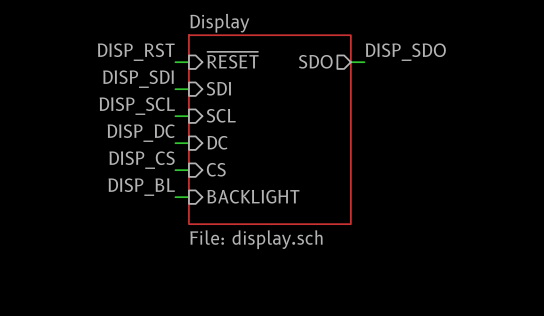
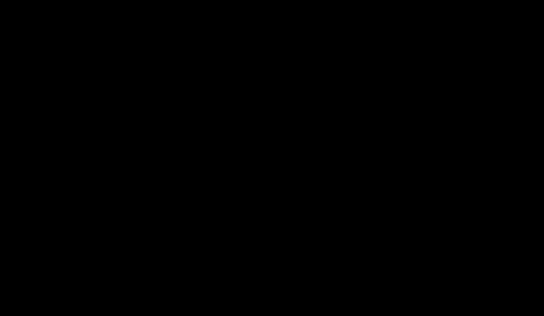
label: DISP_RST (136, 52) -> none
label: DISP_SDO (405, 52) -> none
sheet pin: ~{RESET} (233, 60) -> none
sheet pin: SDO (315, 61) -> none
wire: (175, 62) (188, 62) -> none
wire: (350, 62) (364, 62) -> none
label: DISP_SDI (138, 79) -> none
sheet pin: SDI (218, 88) -> none
wire: (175, 89) (188, 89) -> none
label: DISP_SCL (137, 106) -> none
sheet pin: SCL (221, 115) -> none
wire: (175, 116) (188, 116) -> none
sheet Display: File: display.sch (269, 129) -> none
label: DISP_DC (141, 133) -> none
sheet pin: DC (217, 142) -> none
wire: (175, 143) (188, 143) -> none
label: DISP_CS (142, 160) -> none
sheet pin: CS (216, 169) -> none
wire: (175, 170) (188, 170) -> none
label: DISP_BL (141, 187) -> none
sheet pin: BACKLIGHT (253, 196) -> none
wire: (175, 197) (188, 197) -> none

